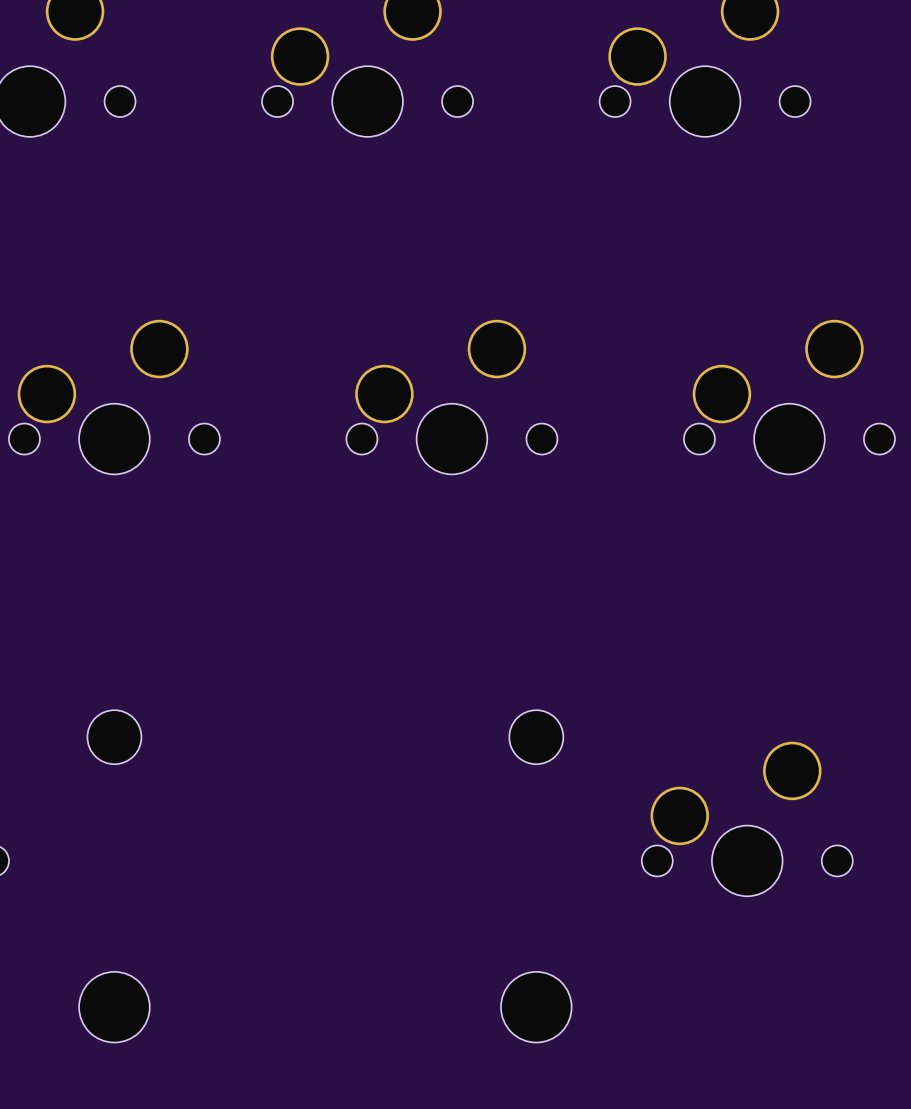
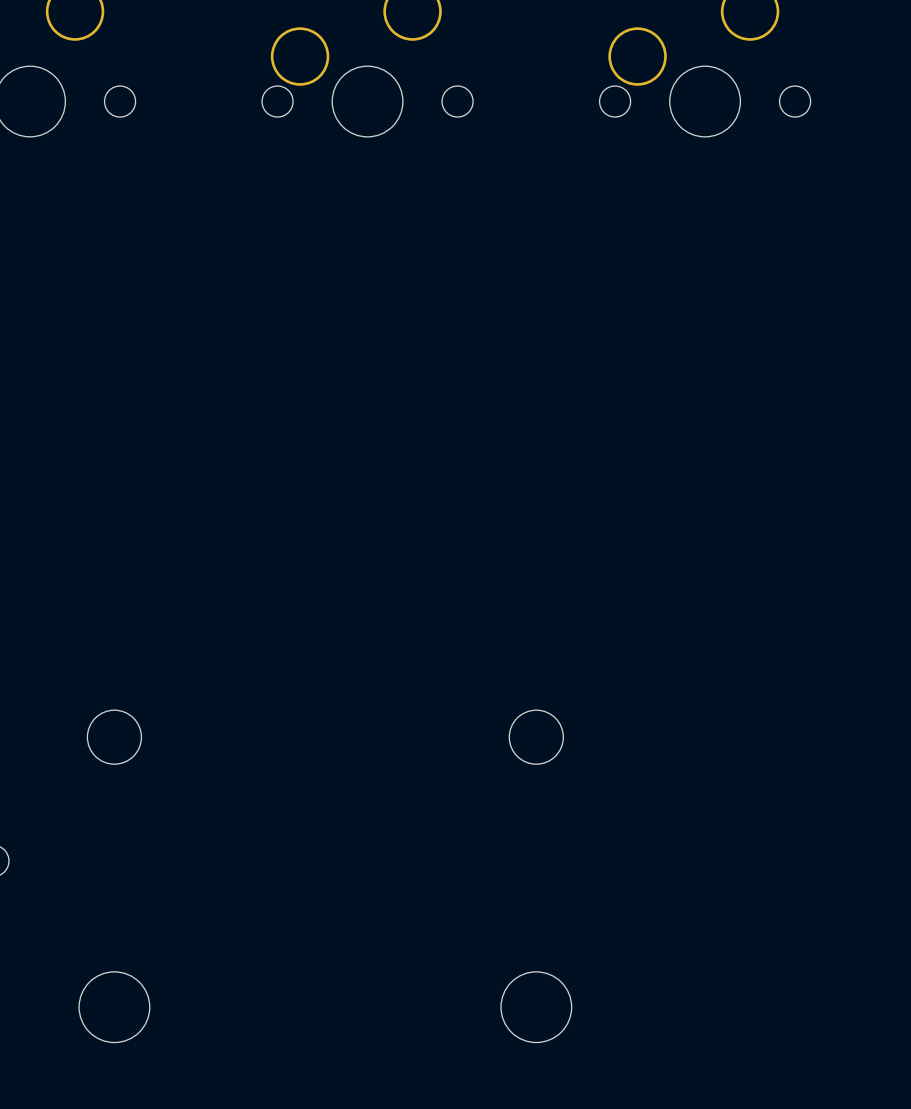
part: (114, 397) -> none
part: (451, 397) -> none
part: (789, 397) -> none
part: (747, 818) -> none

